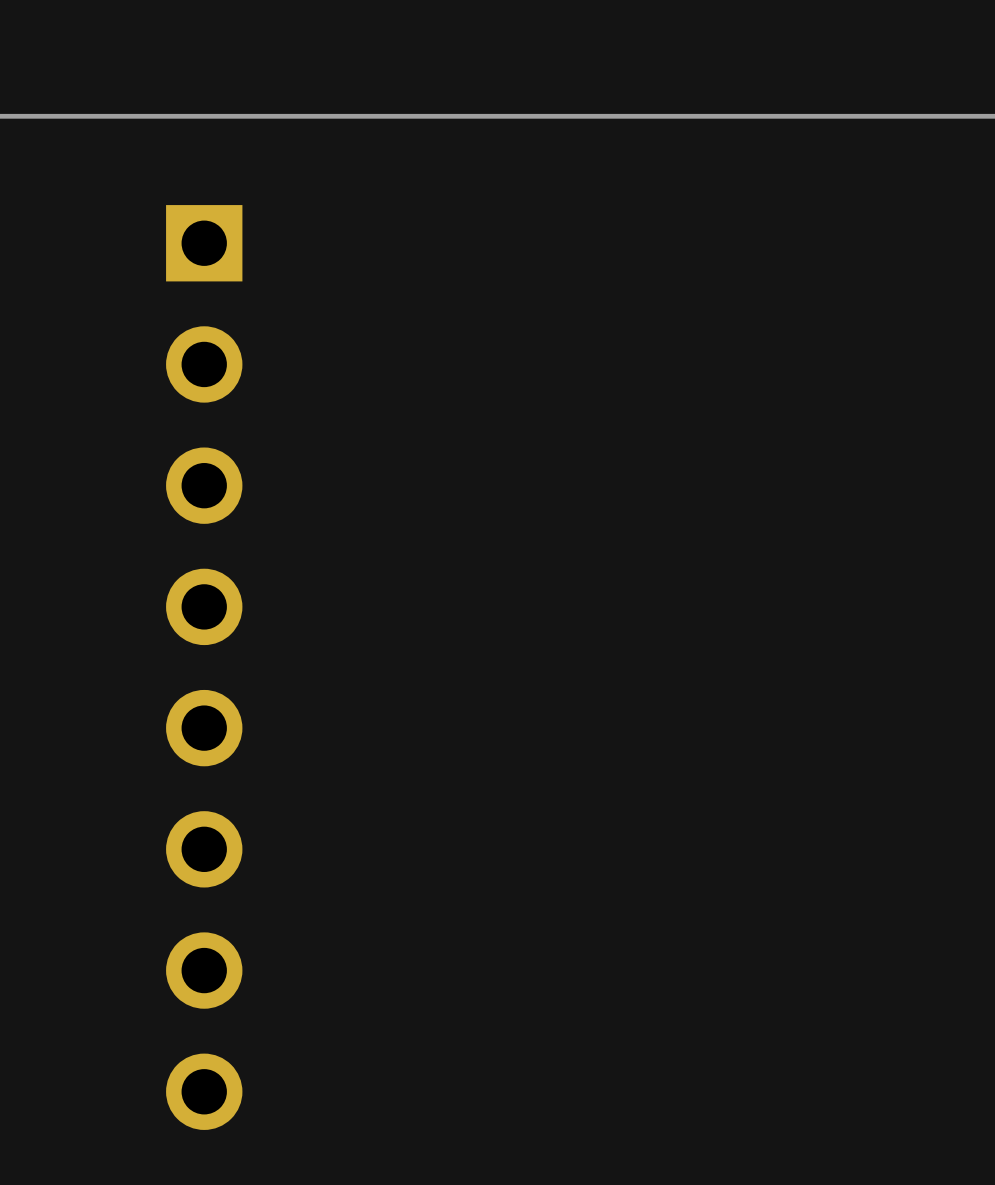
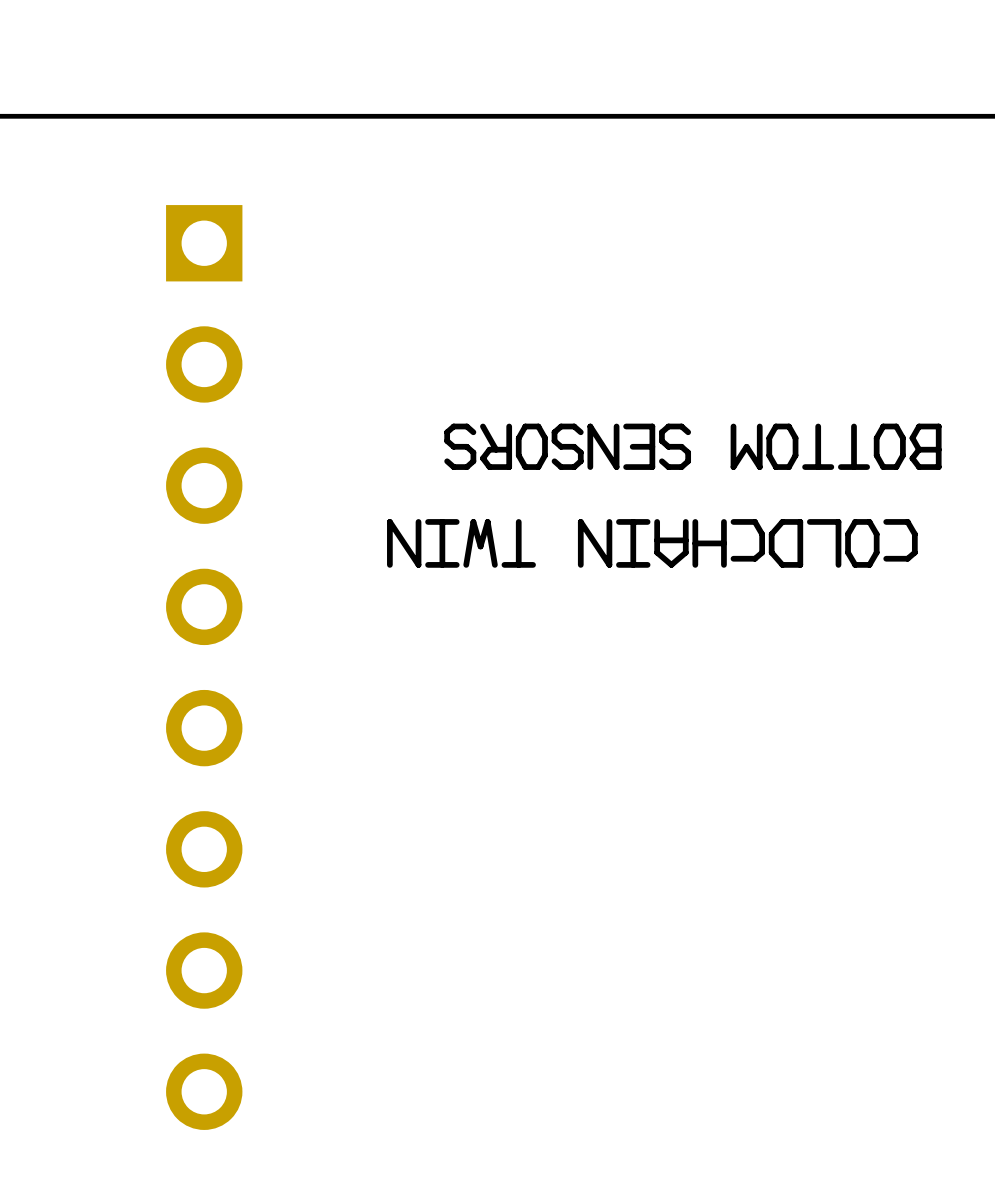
line: none -> (482, 426) (496, 449)
line: none -> (509, 426) (509, 467) (489, 467) (482, 458) (489, 449) (509, 449)
line: none -> (538, 426) (525, 426) (518, 438) (518, 455) (525, 467) (538, 467) (544, 455) (544, 438) (538, 426)
line: none -> (616, 426) (616, 467) (590, 426) (590, 467)
line: none -> (626, 426) (652, 426) (652, 467) (626, 467)
line: none -> (759, 426) (759, 467) (746, 446) (733, 467) (733, 426)
line: none -> (788, 426) (775, 426) (769, 438) (769, 455) (775, 467) (788, 467) (795, 455) (795, 438) (788, 426)
line: none -> (818, 426) (818, 467)
line: none -> (854, 426) (854, 467)
line: none -> (896, 426) (883, 426) (876, 438) (876, 455) (883, 467) (896, 467) (902, 455) (902, 438) (896, 426)
line: none -> (473, 432) (466, 426) (453, 426) (447, 432) (447, 441) (453, 446) (466, 446) (473, 452) (473, 461) (466, 467) (453, 467) (447, 461)
line: none -> (580, 432) (574, 426) (561, 426) (554, 432) (554, 441) (561, 446) (574, 446) (580, 452) (580, 461) (574, 467) (561, 467) (554, 461)
line: none -> (688, 432) (681, 426) (668, 426) (661, 432) (661, 441) (668, 446) (681, 446) (688, 452) (688, 461) (681, 467) (668, 467) (661, 461)
line: none -> (652, 446) (632, 446)
line: none -> (919, 449) (912, 458) (919, 467) (938, 467) (938, 426) (919, 426) (912, 438) (919, 449)
line: none -> (938, 449) (919, 449)
line: none -> (831, 467) (805, 467)
line: none -> (867, 467) (840, 467)
line: none -> (418, 521) (418, 564) (389, 521) (389, 564)
line: none -> (442, 521) (442, 564)
line: none -> (456, 521) (428, 521)
line: none -> (518, 521) (518, 564)
line: none -> (609, 521) (609, 564) (580, 521) (580, 564)
line: none -> (633, 521) (633, 564)
line: none -> (647, 521) (618, 521)
line: none -> (685, 521) (685, 552) (671, 564) (657, 552) (657, 521)
line: none -> (695, 521) (695, 564)
line: none -> (723, 521) (723, 564)
line: none -> (733, 521) (754, 521) (762, 534) (762, 552) (754, 558) (733, 558)
line: none -> (800, 521) (782, 521) (771, 534) (771, 552) (782, 564) (800, 564) (800, 521)
line: none -> (809, 521) (838, 521) (838, 564)
line: none -> (869, 521) (855, 521) (848, 534) (848, 552) (855, 564) (869, 564) (876, 552) (876, 534) (869, 521)
line: none -> (886, 521) (907, 521) (914, 534) (914, 552) (907, 558) (886, 558)
line: none -> (685, 540) (657, 540)
line: none -> (723, 543) (695, 543)
line: none -> (456, 564) (428, 564)
line: none -> (494, 564) (487, 521) (480, 546) (473, 521) (466, 564)
line: none -> (533, 564) (504, 564)
line: none -> (647, 564) (618, 564)

